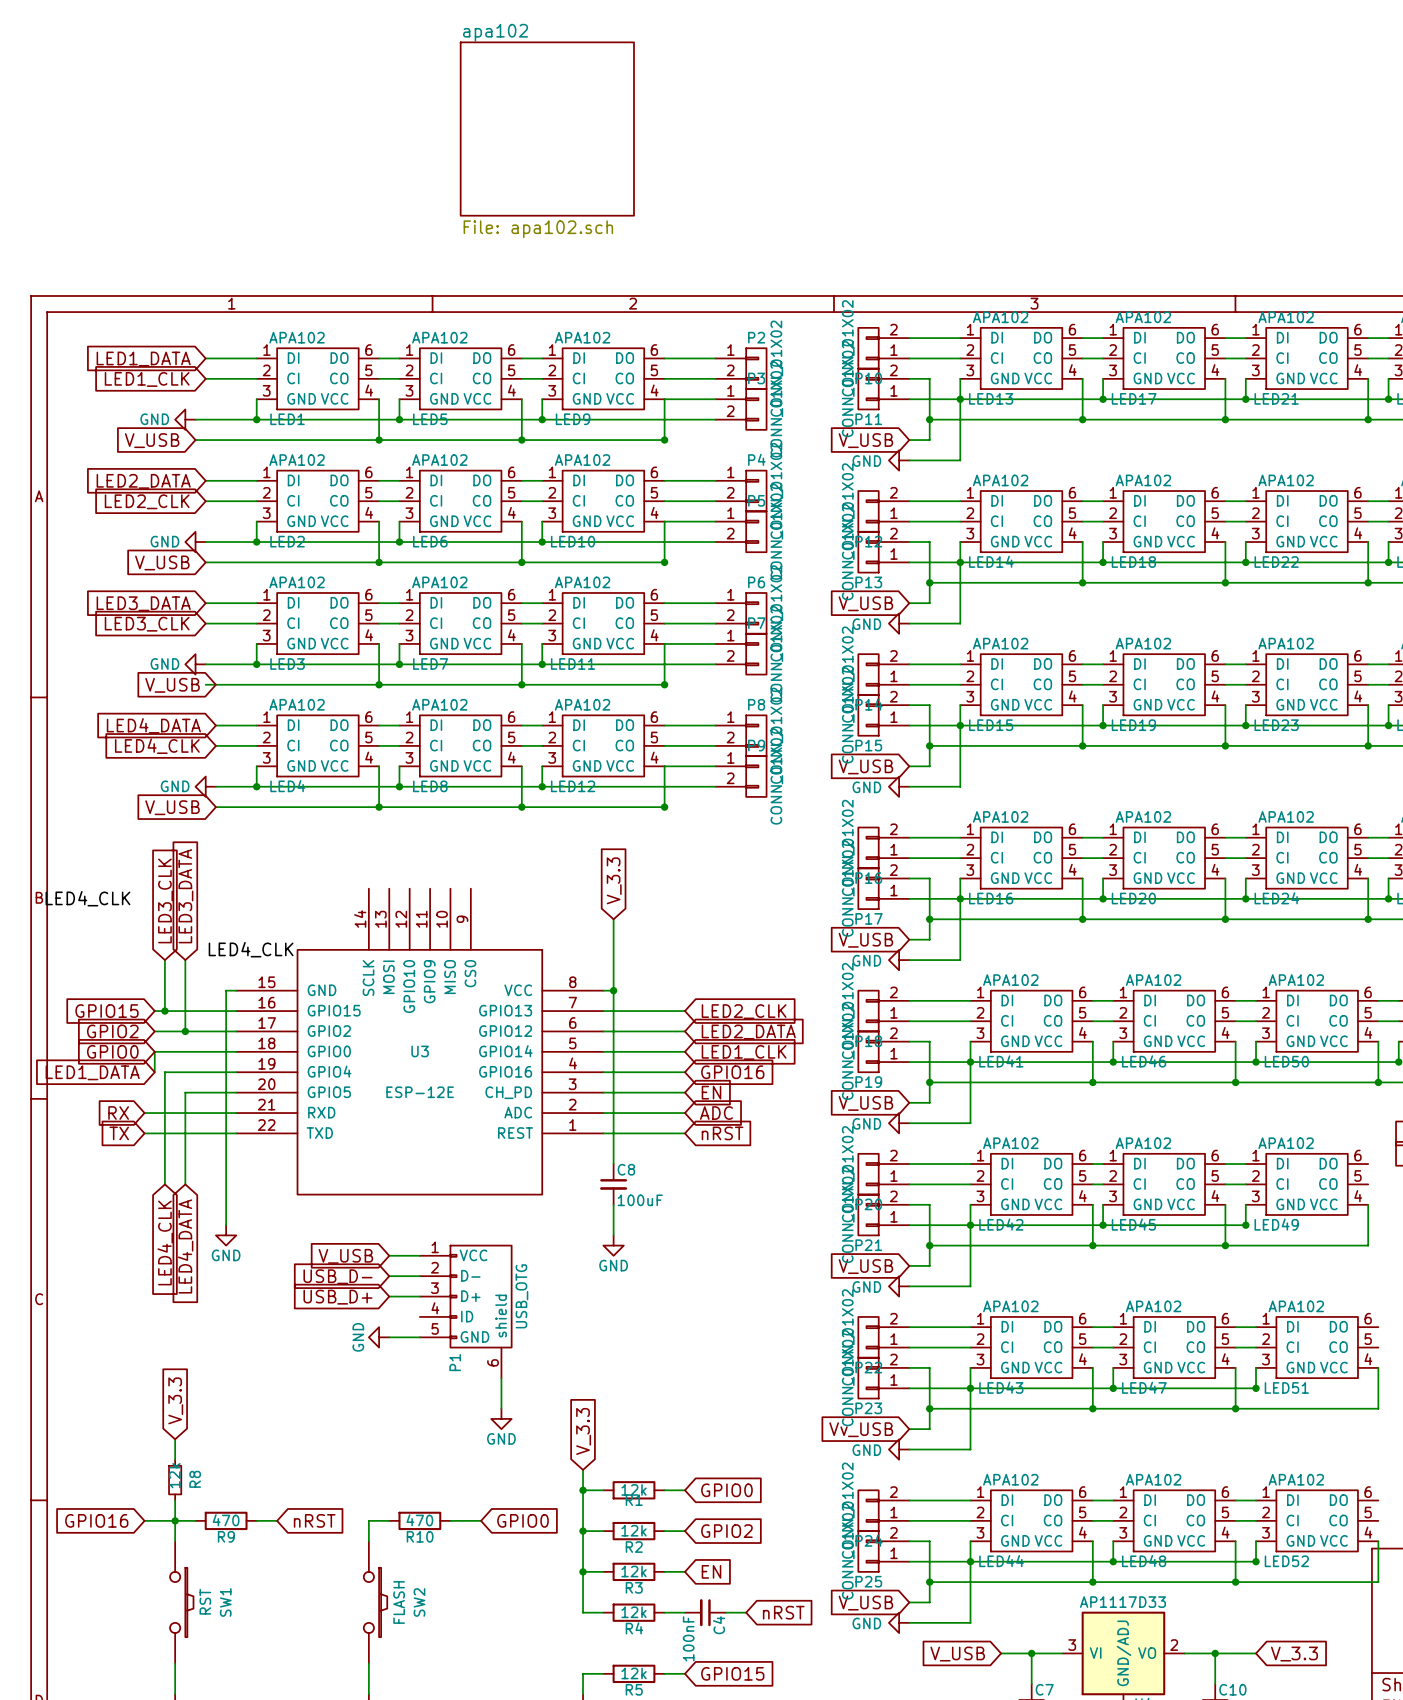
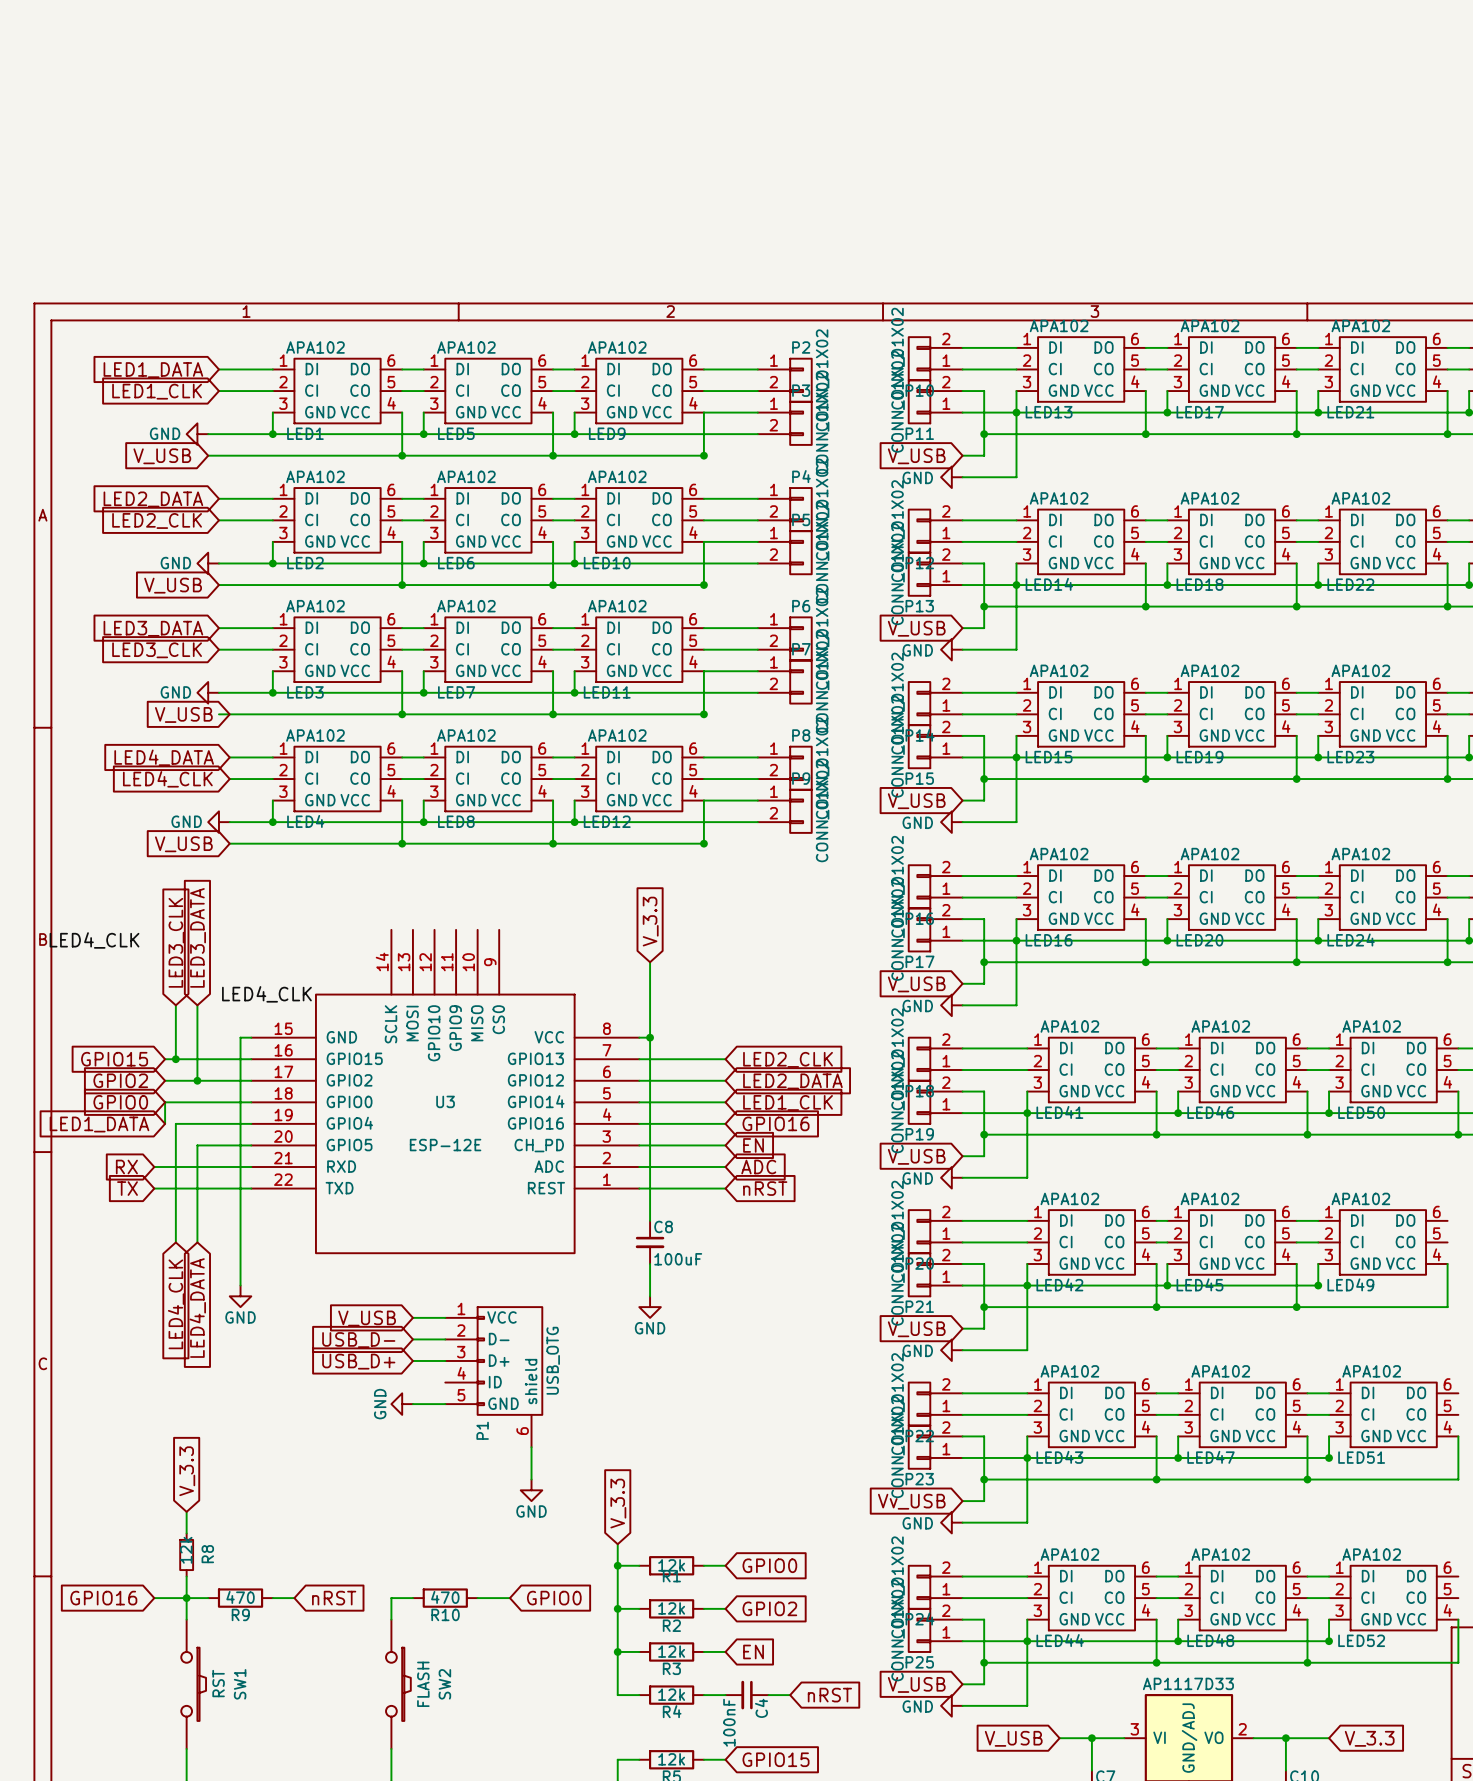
sheet apa102: File: apa102.sch (547, 129) -> none

